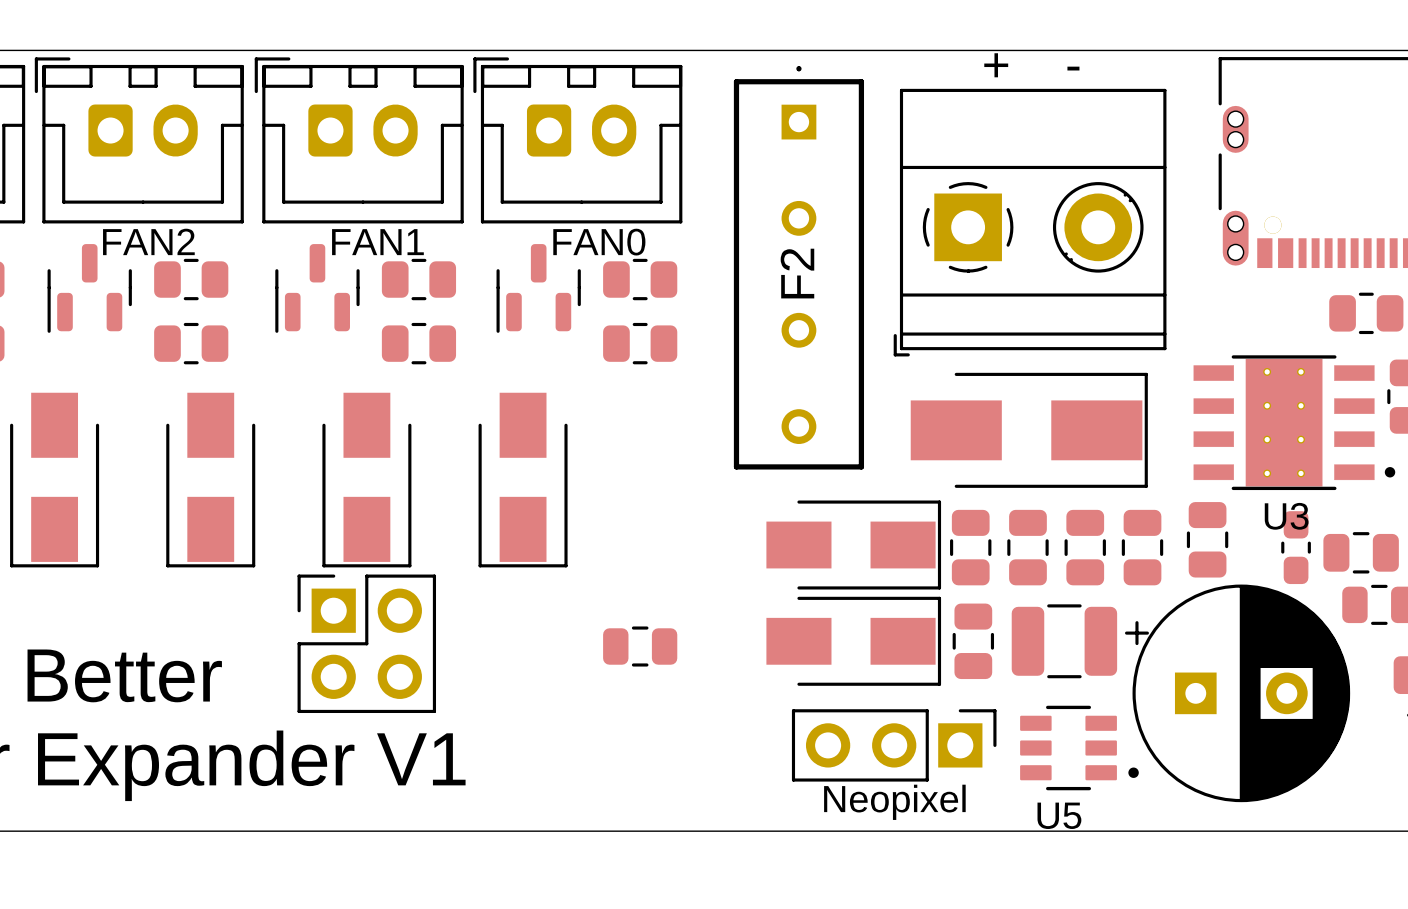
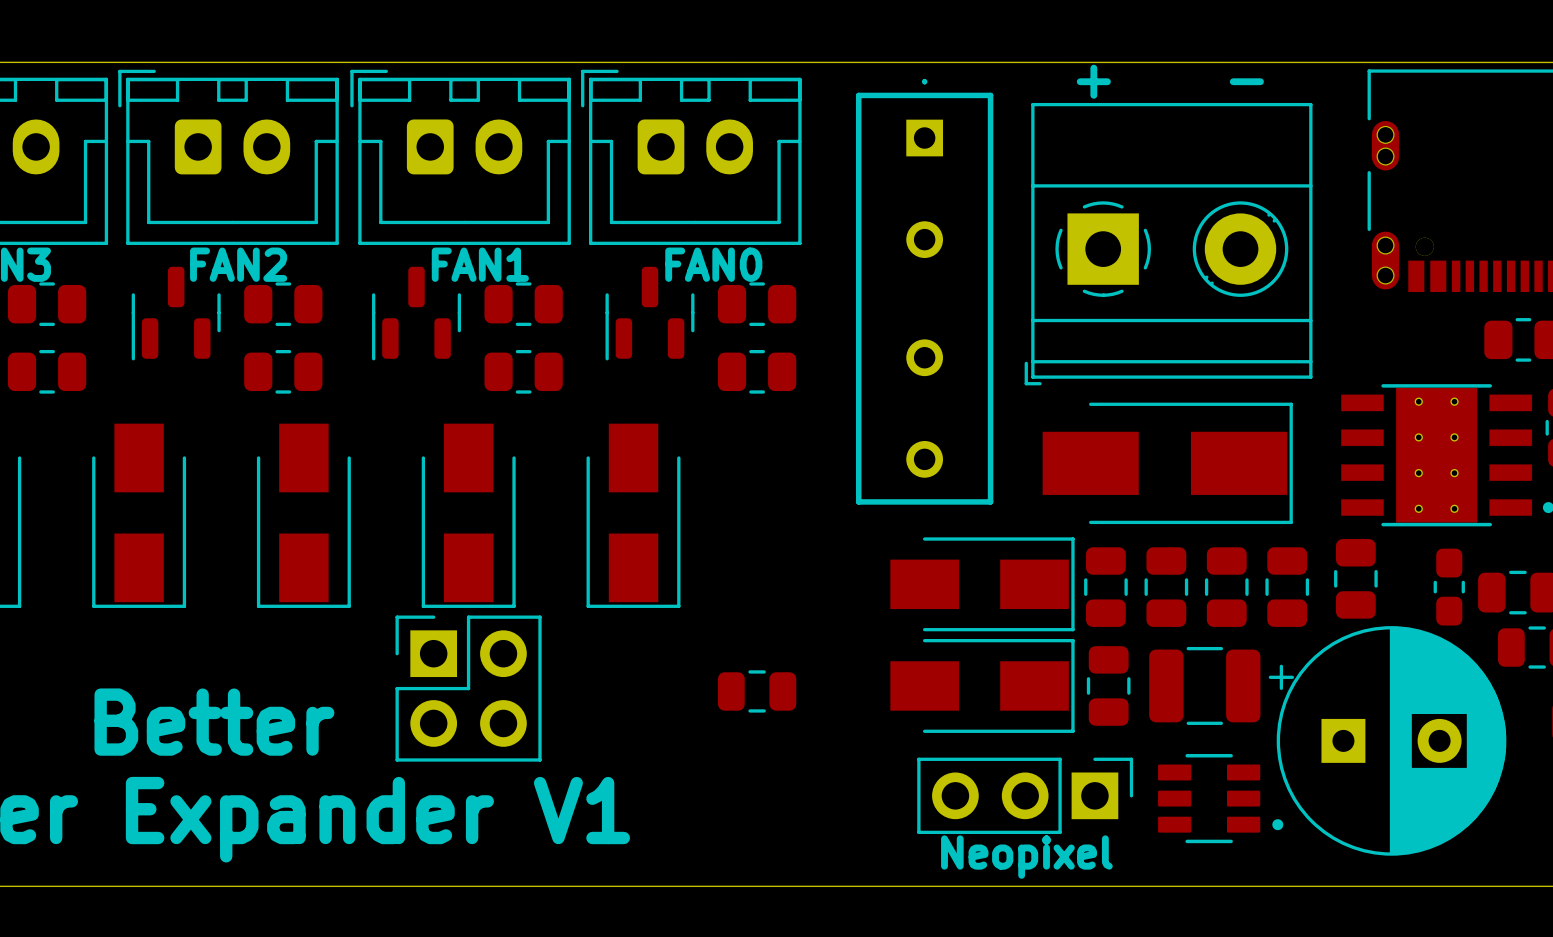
F2 name: F2 (797, 273) -> none
U3 name: U3 (1286, 516) -> none
U5 name: U5 (1059, 815) -> none

